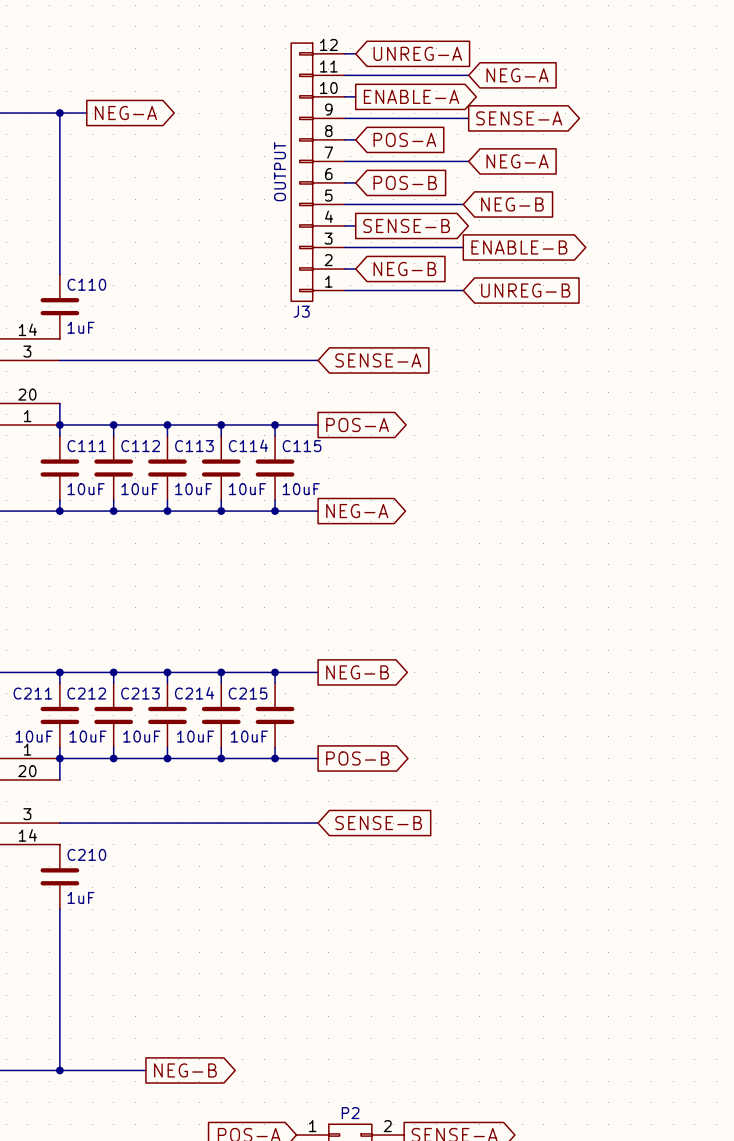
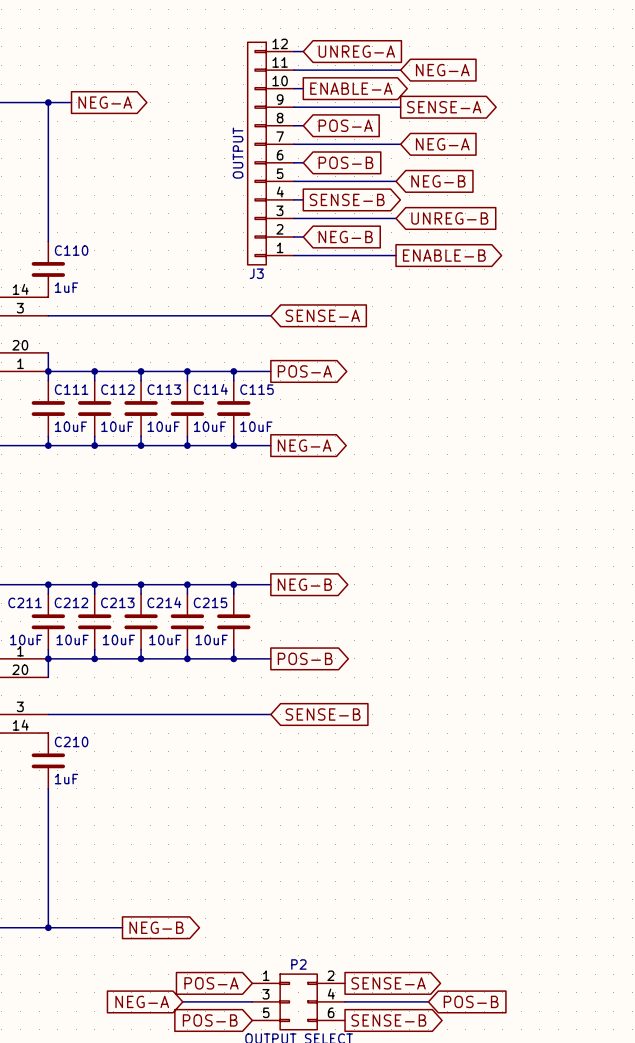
global label shape: output (519, 247) -> input (449, 218)
global label: ENABLE-B (519, 247) -> UNREG-B (449, 218)
global label shape: input (525, 290) -> output (444, 255)
global label: UNREG-B (525, 290) -> ENABLE-B (444, 255)

